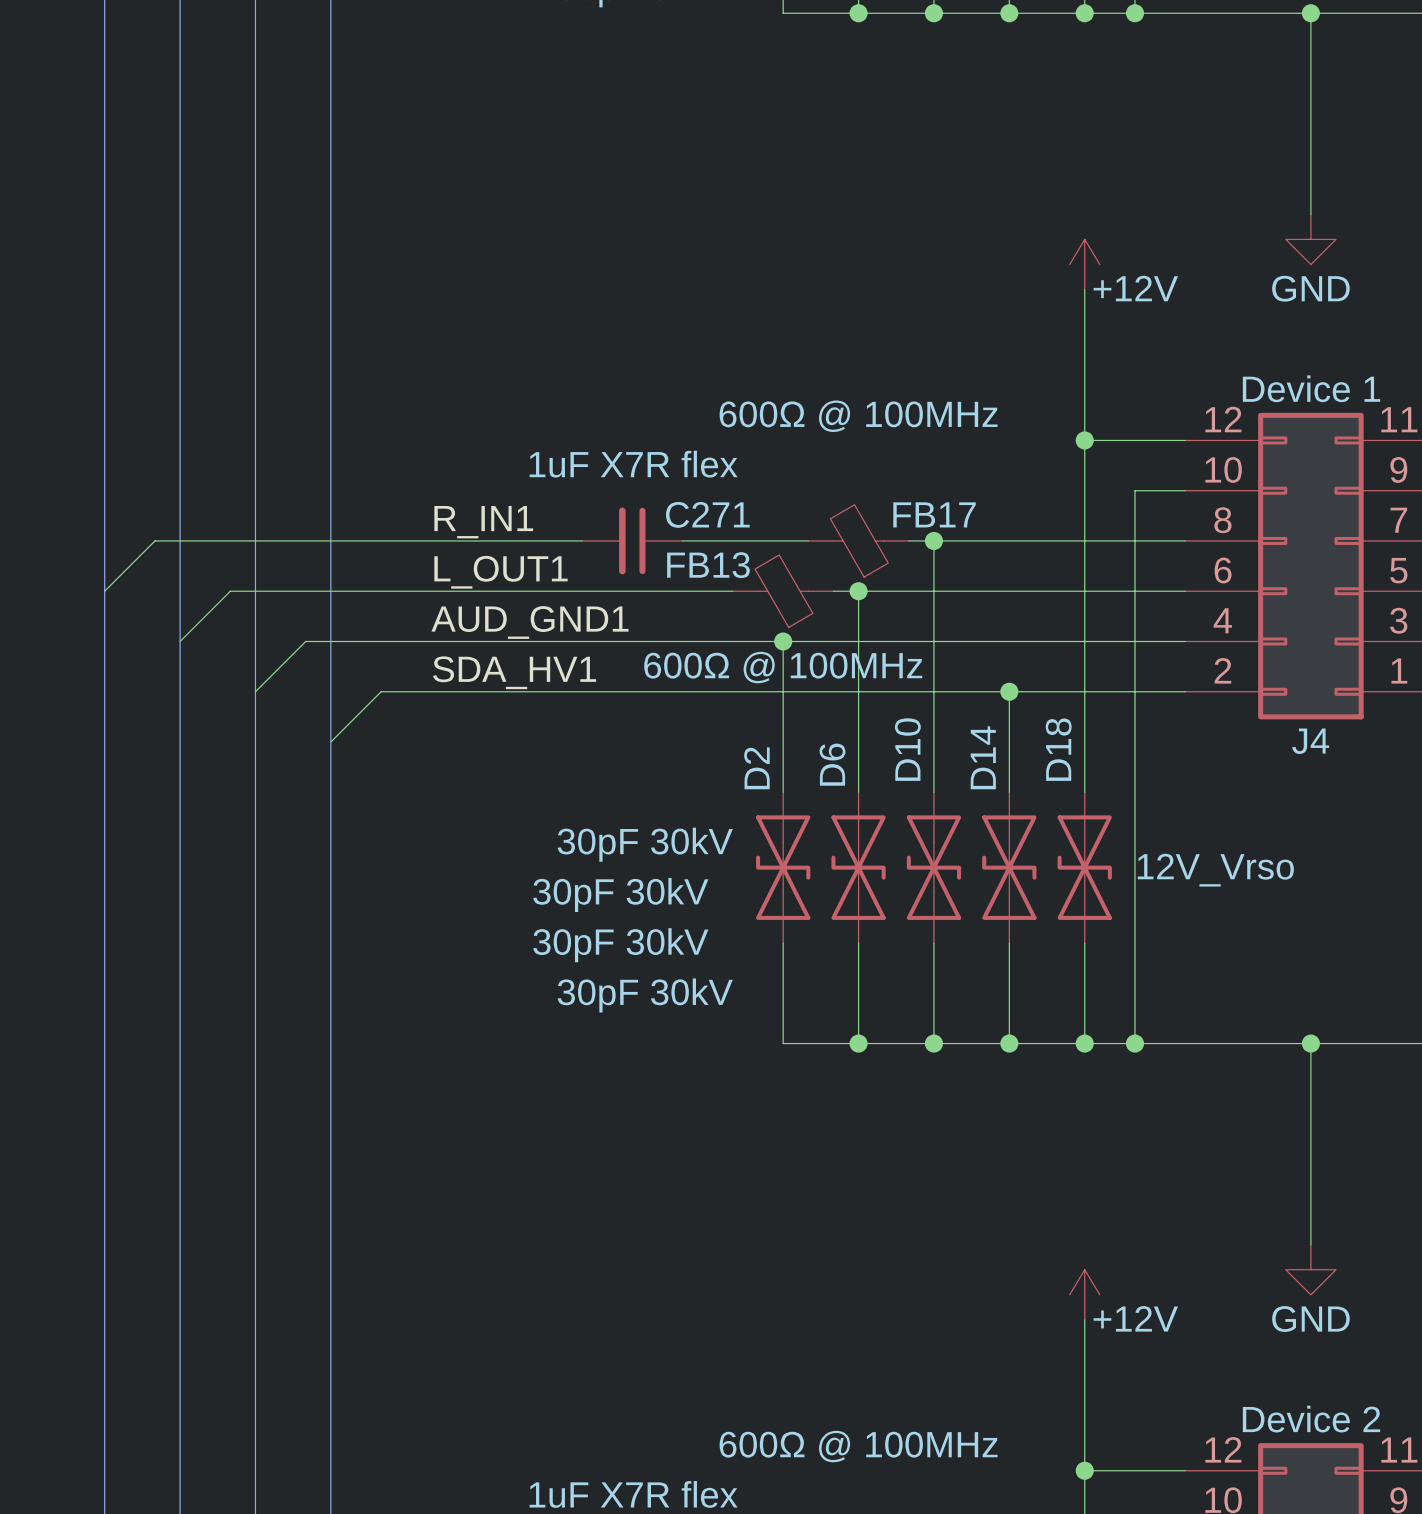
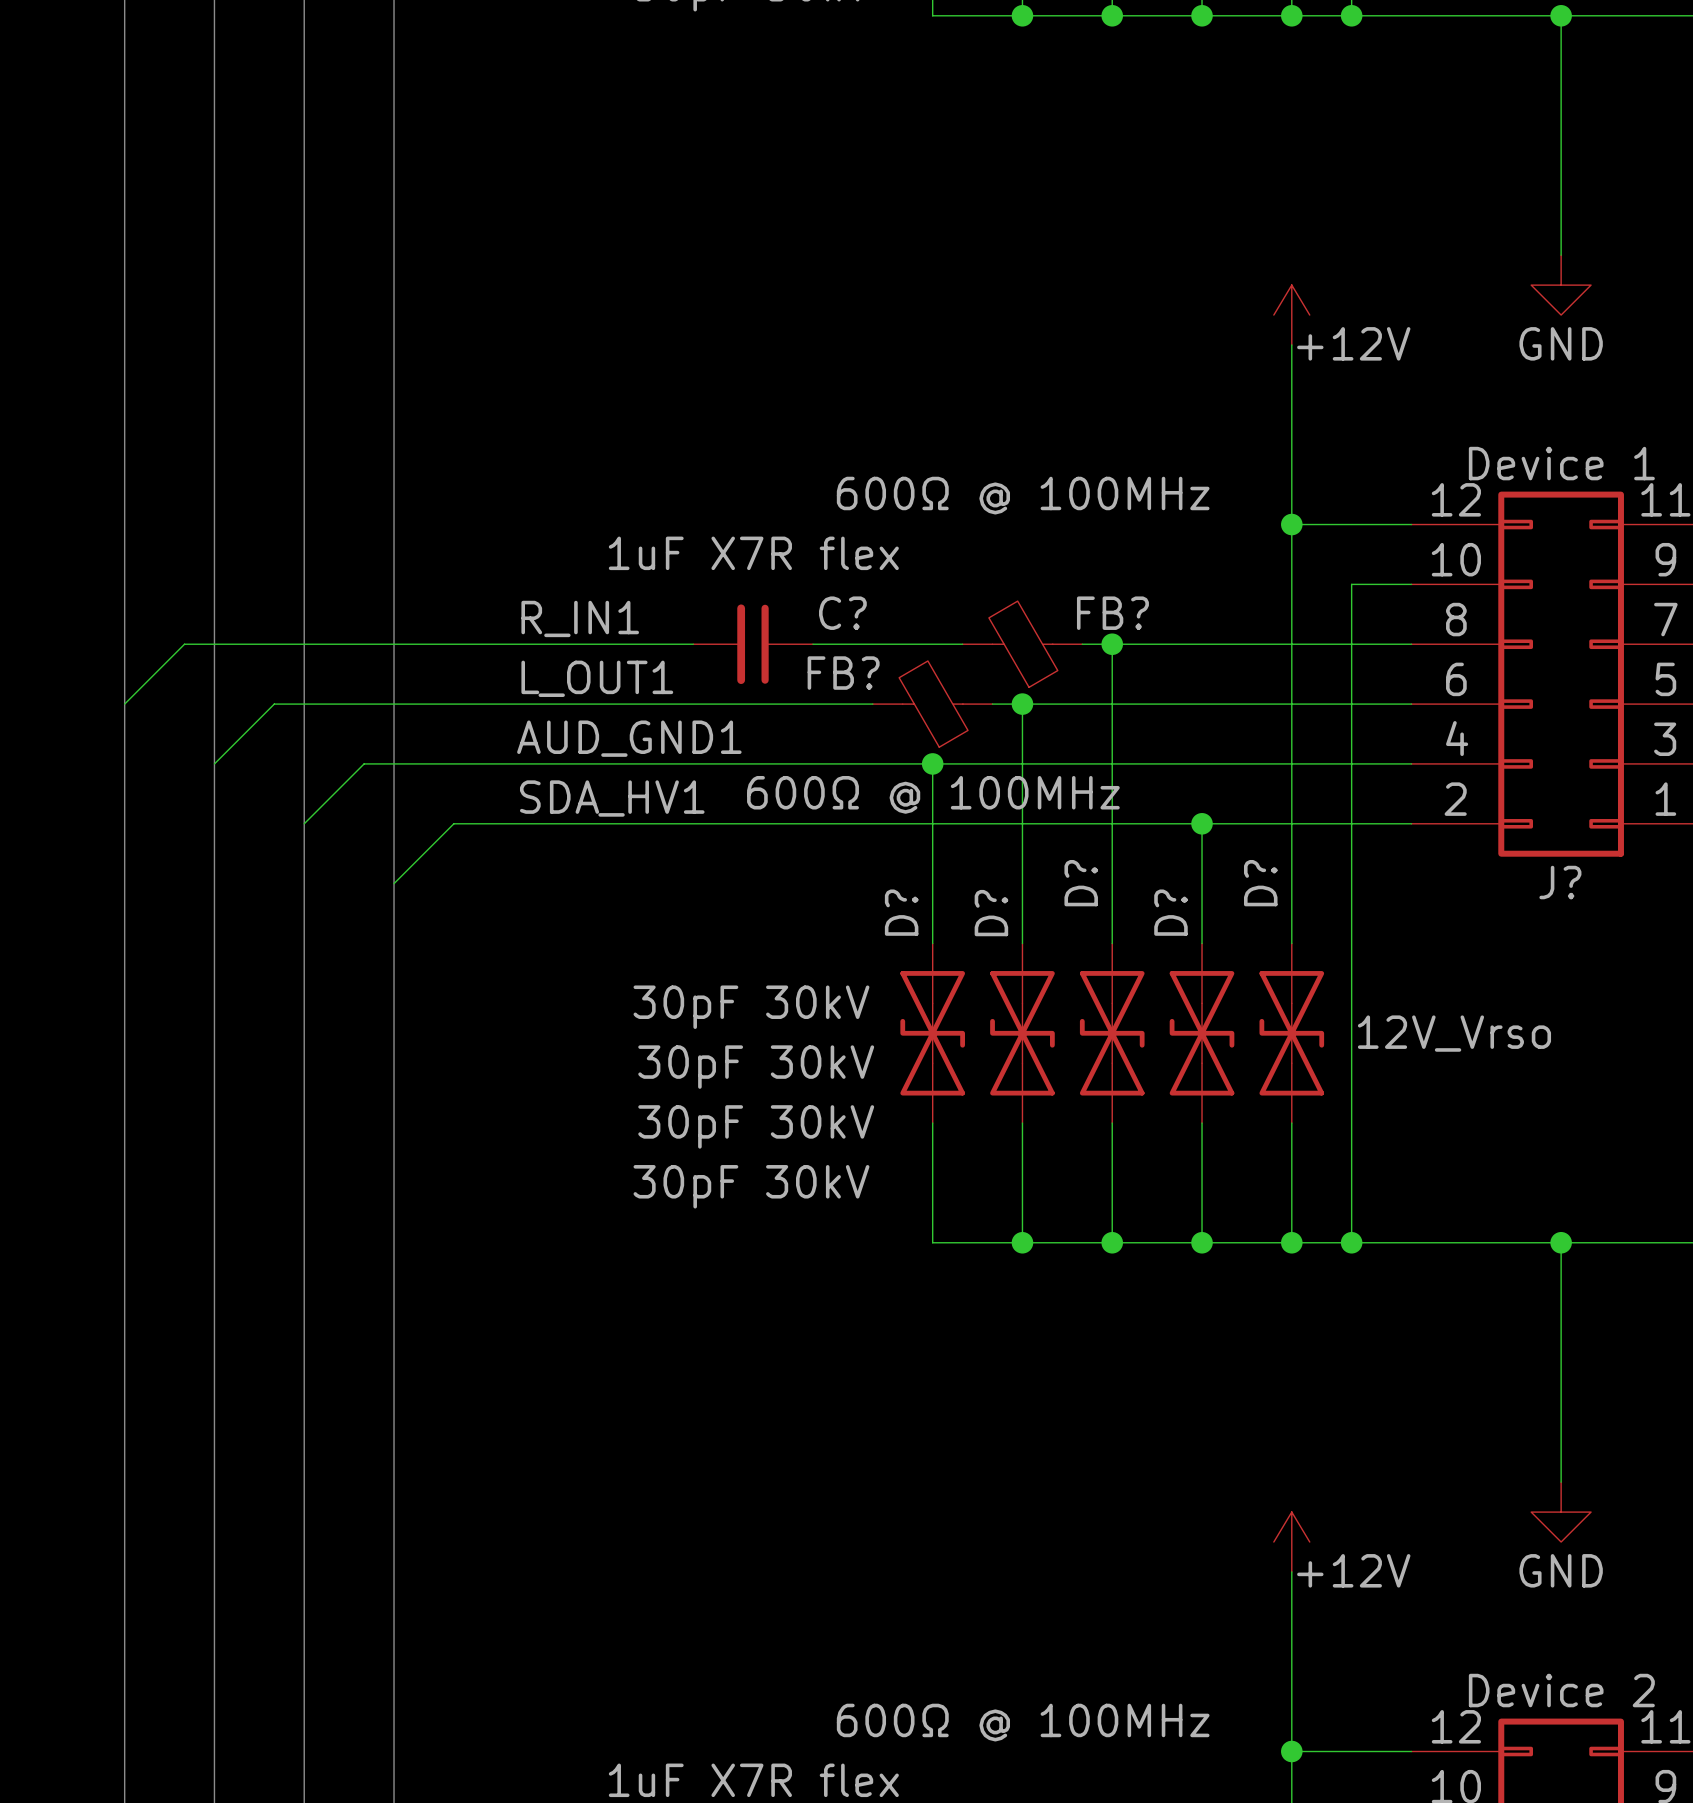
C271 name: C271 (707, 514) -> C? (842, 613)
FB17 name: FB17 (934, 514) -> FB? (1112, 613)
FB13 name: FB13 (708, 565) -> FB? (843, 673)
J4 name: J4 (1310, 741) -> J? (1560, 882)
D10 name: D10 (907, 749) -> D? (1081, 883)
D18 name: D18 (1058, 749) -> D? (1260, 883)
D14 name: D14 (983, 757) -> D? (1170, 912)
D6 name: D6 (832, 764) -> D? (991, 913)
D2 name: D2 (756, 768) -> D? (901, 912)

